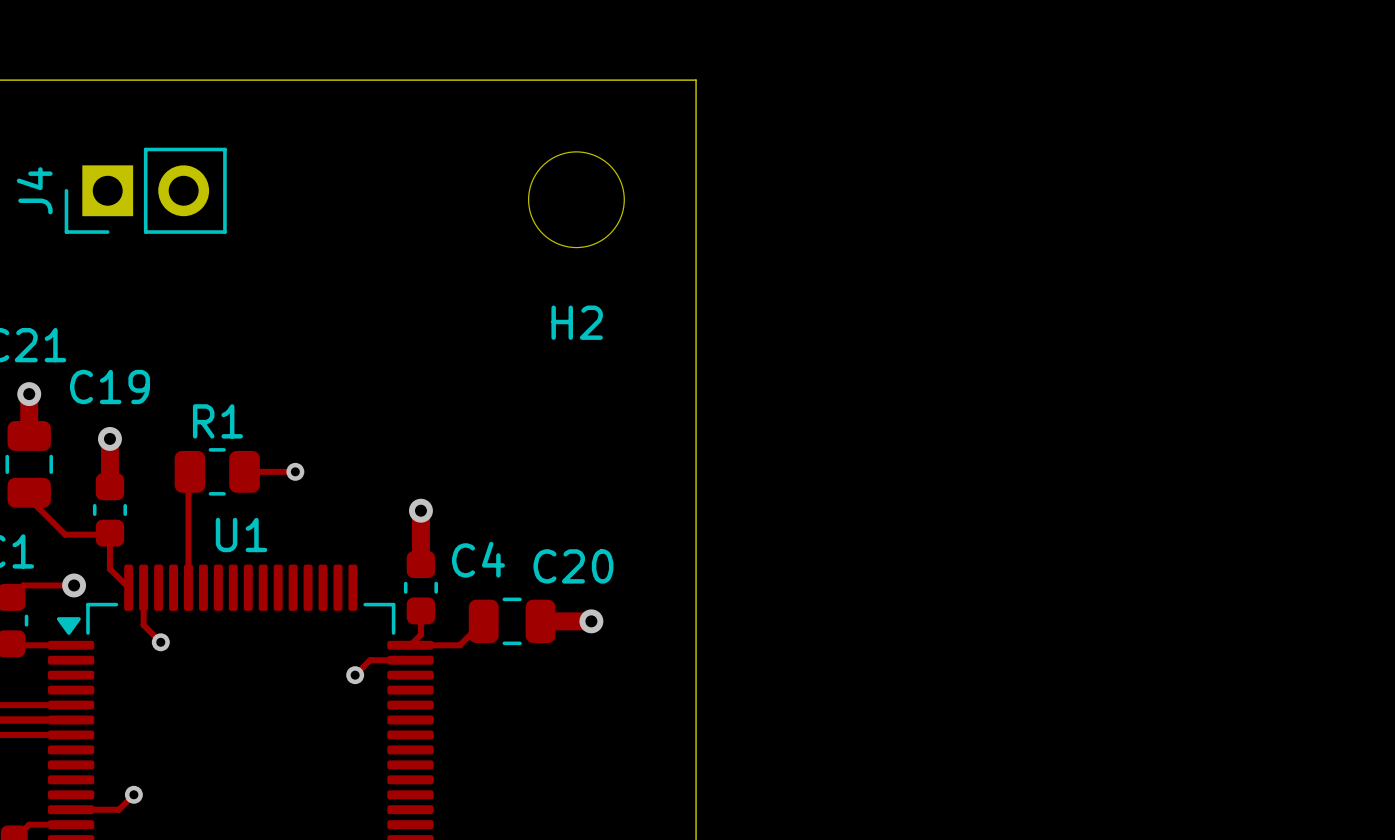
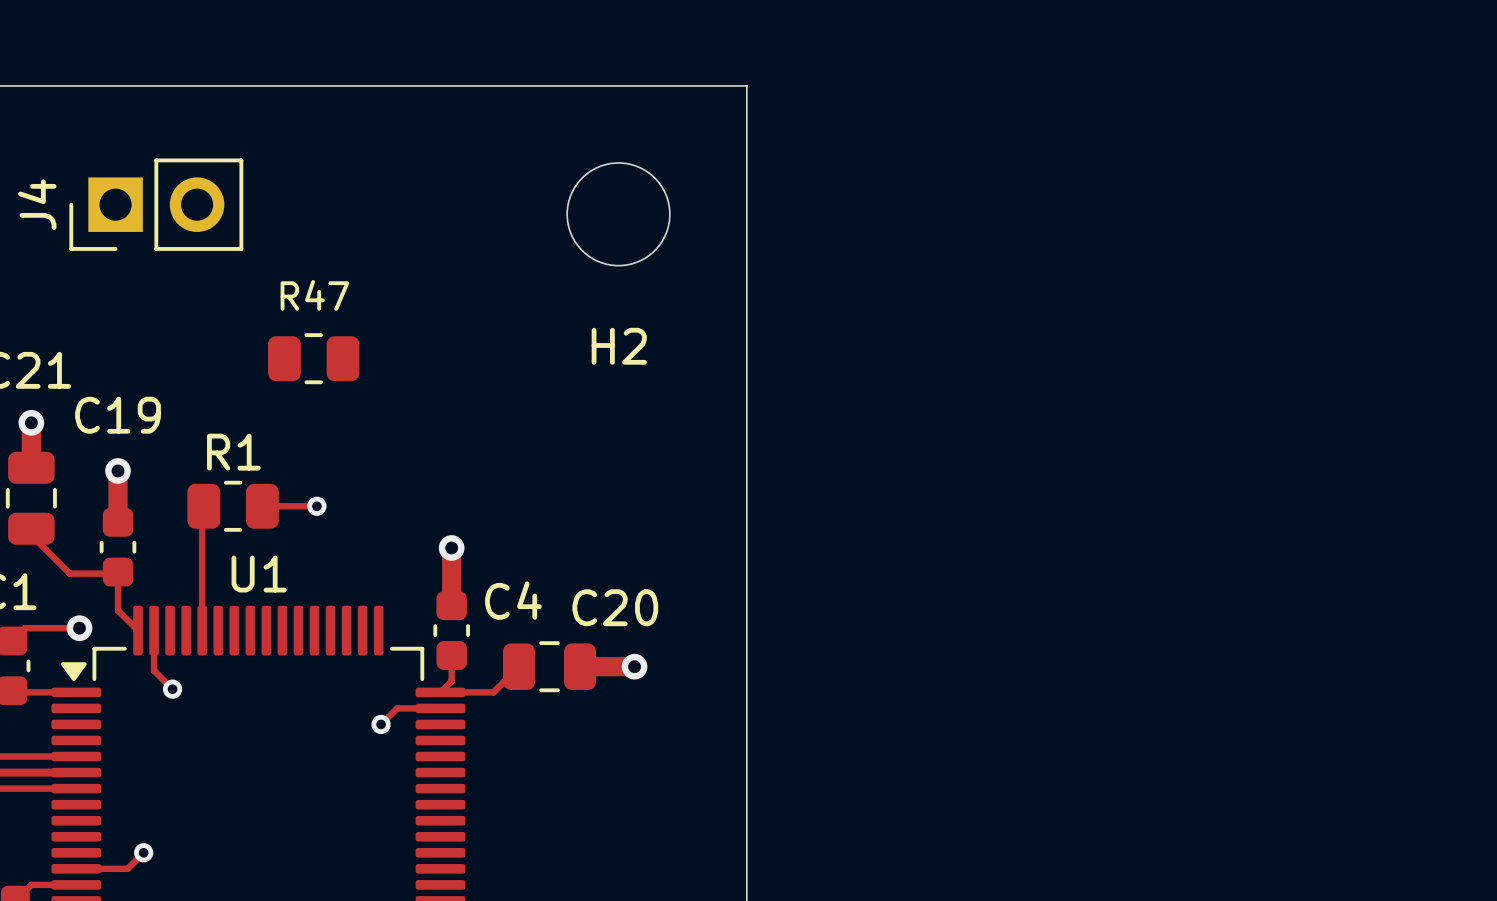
R47: none -> (313, 358)

